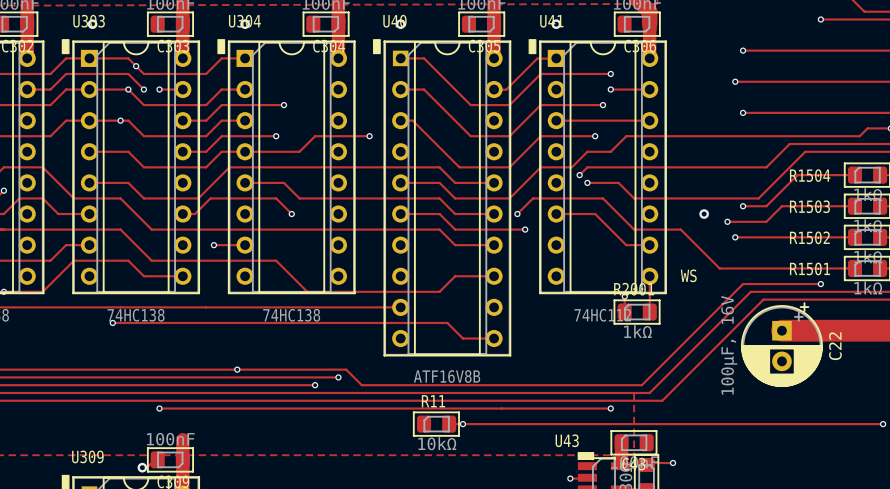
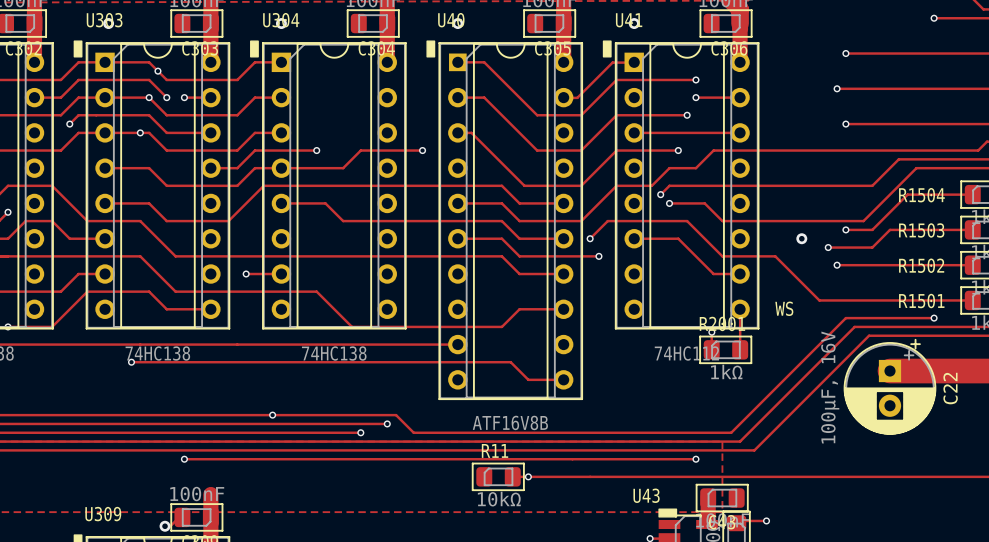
track: (283, 105) (221, 105) (206, 120) (182, 120) -> (69, 124) (78, 115) (149, 115) (166, 132) (210, 132)
via: (283, 105) -> none
via: none -> (69, 124)
track: (182, 214) (194, 214) (210, 198) (276, 198) (291, 214) -> none
via: (291, 214) -> none

